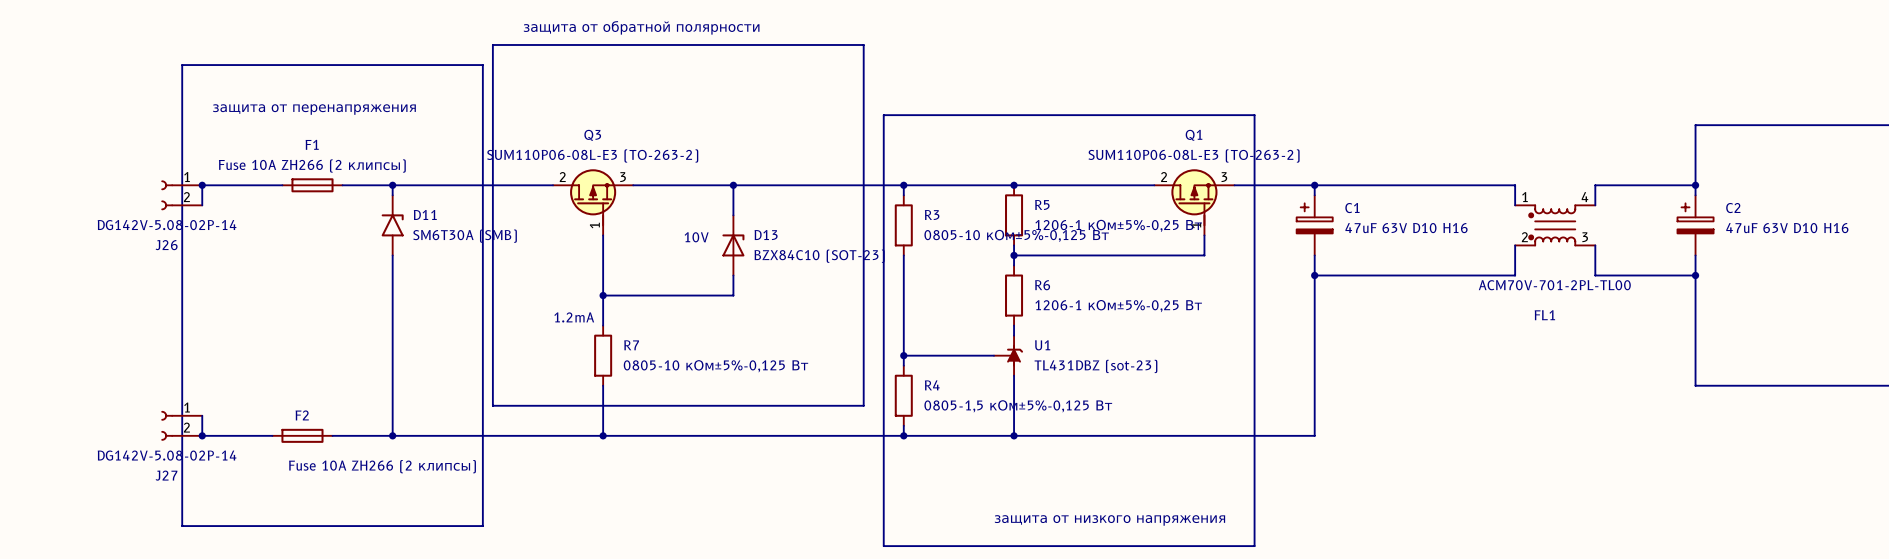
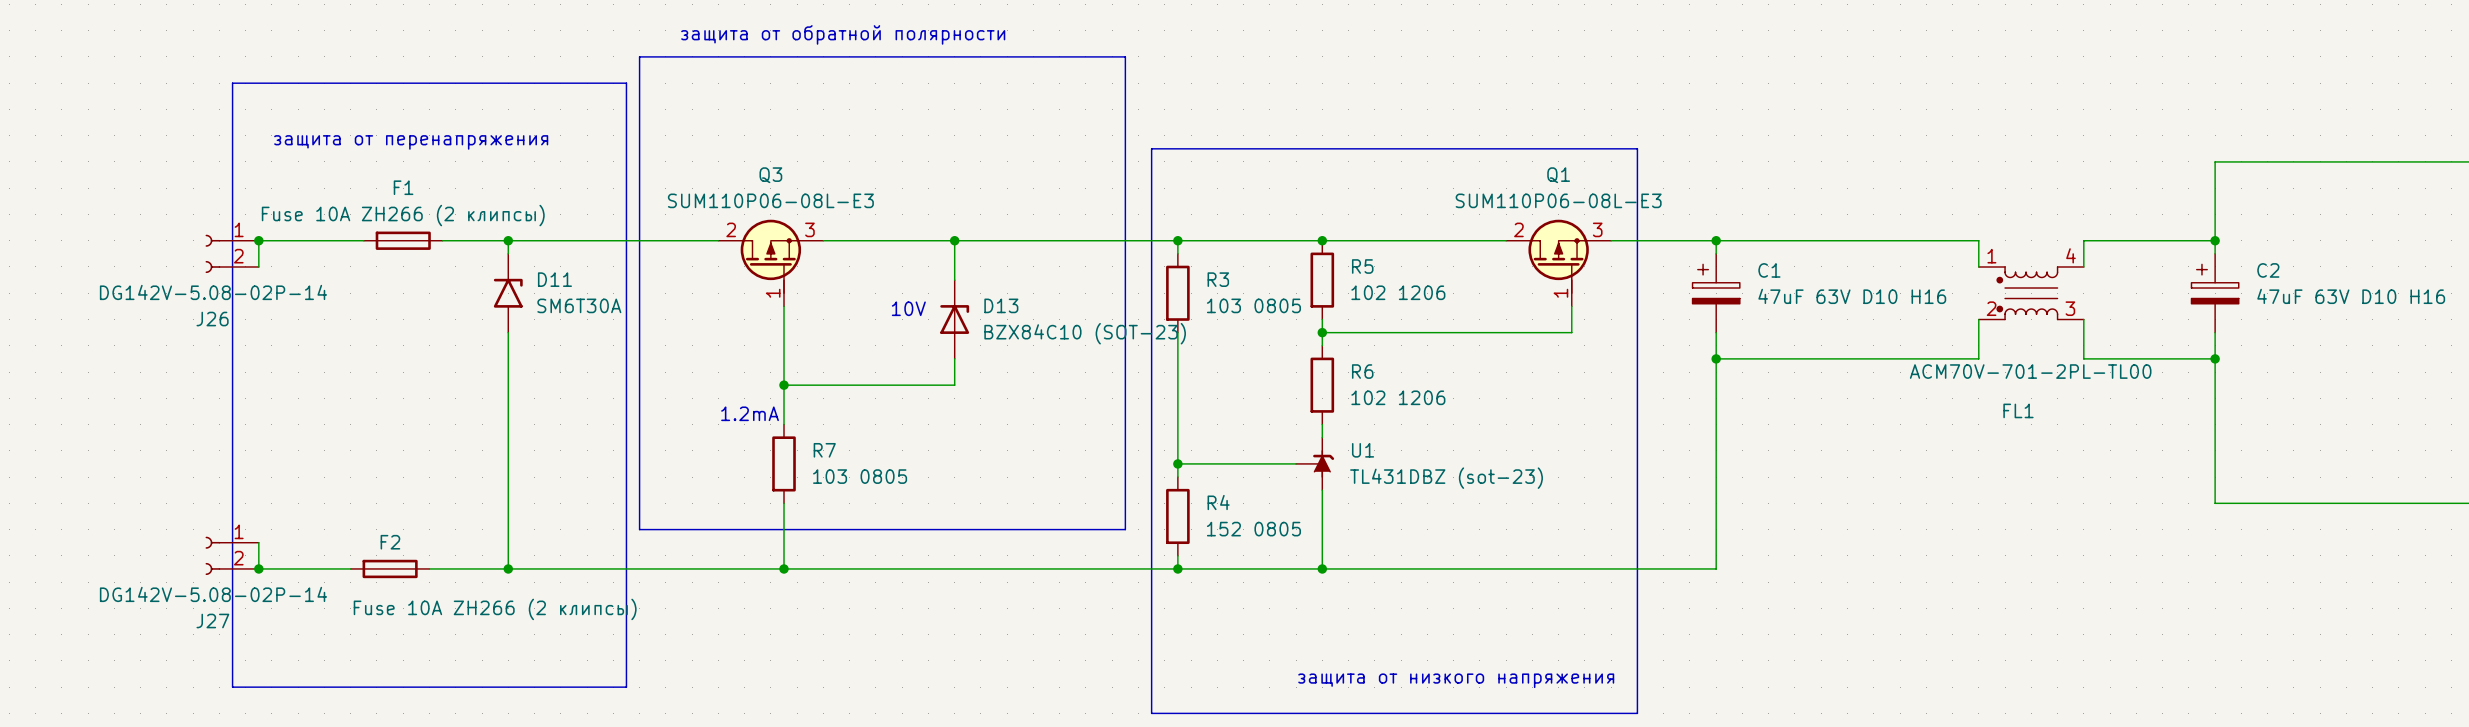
Q3 value: SUM110P06-08L-E3 (TO-263-2) (592, 155) -> SUM110P06-08L-E3 (770, 200)
Q1 value: SUM110P06-08L-E3 (TO-263-2) (1194, 155) -> SUM110P06-08L-E3 (1558, 200)
R5 value: 1206-1 кОм±5%-0,25 Вт (1118, 225) -> 102 1206 (1398, 292)
R3 value: 0805-10 кОм±5%-0,125 Вт (1016, 235) -> 103 0805 (1253, 305)
D11 value: SM6T30A (SMB) (465, 236) -> SM6T30A (579, 305)
R6 value: 1206-1 кОм±5%-0,25 Вт (1118, 306) -> 102 1206 (1398, 397)
R7 value: 0805-10 кОм±5%-0,125 Вт (715, 366) -> 103 0805 (860, 476)
R4 value: 0805-1,5 кОм±5%-0,125 Вт (1018, 406) -> 152 0805 (1253, 529)

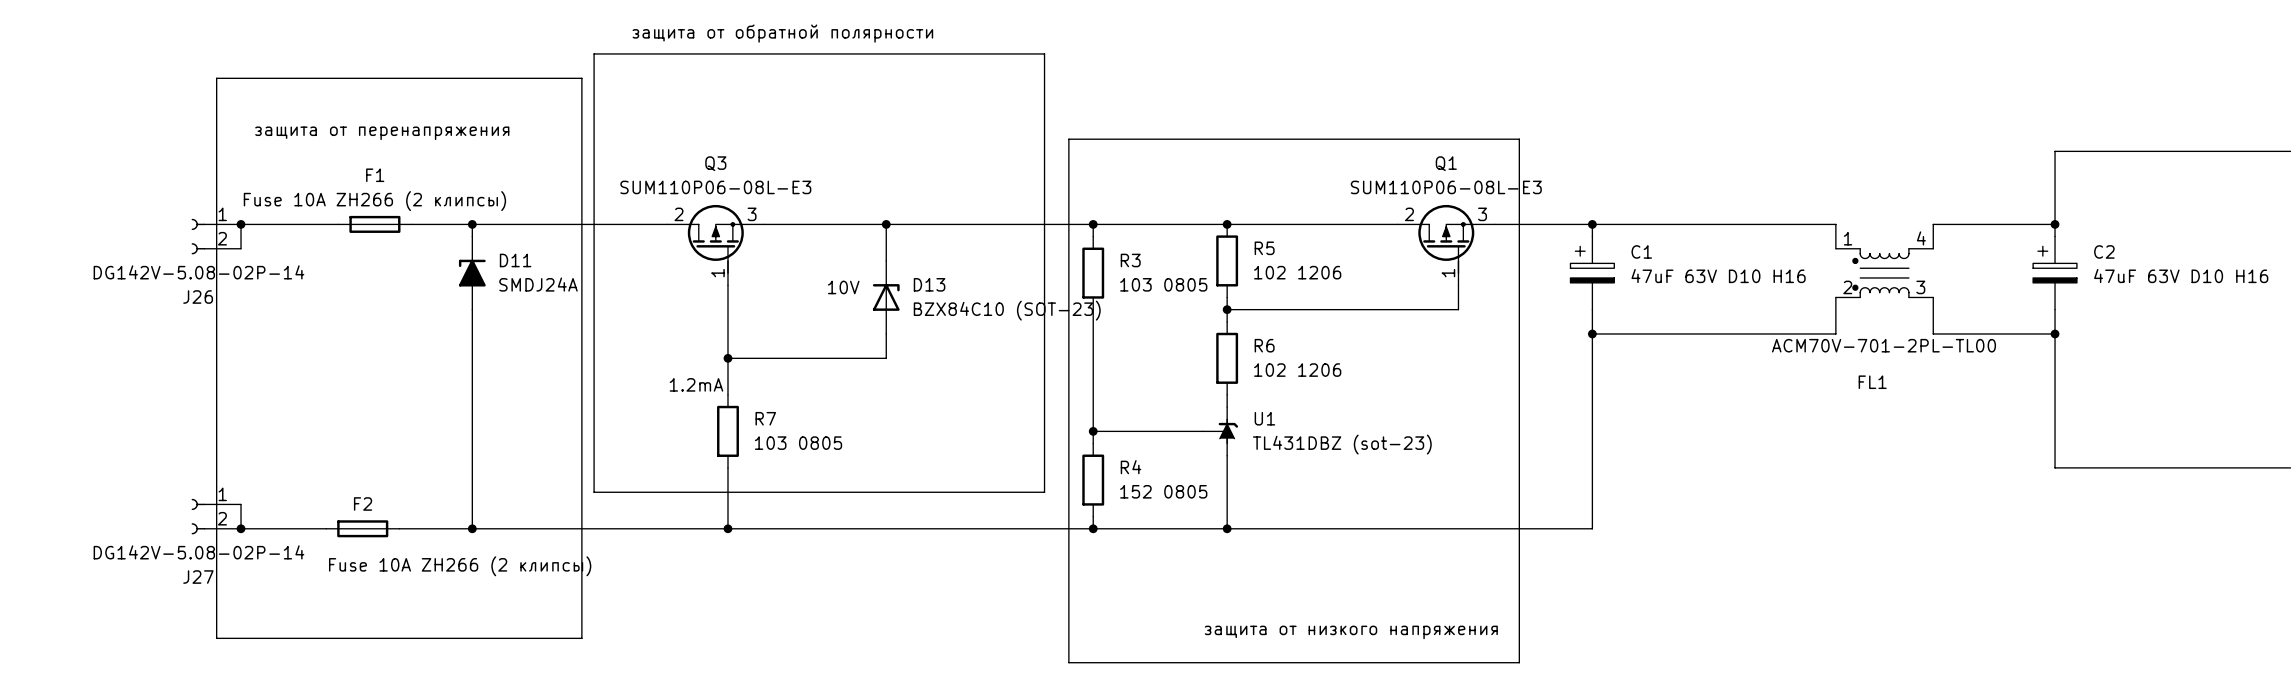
D11 symbol: [493, 253, 523, 333] -> [458, 236, 486, 310]
D11 value: SM6T30A (579, 305) -> SMDJ24A (538, 284)

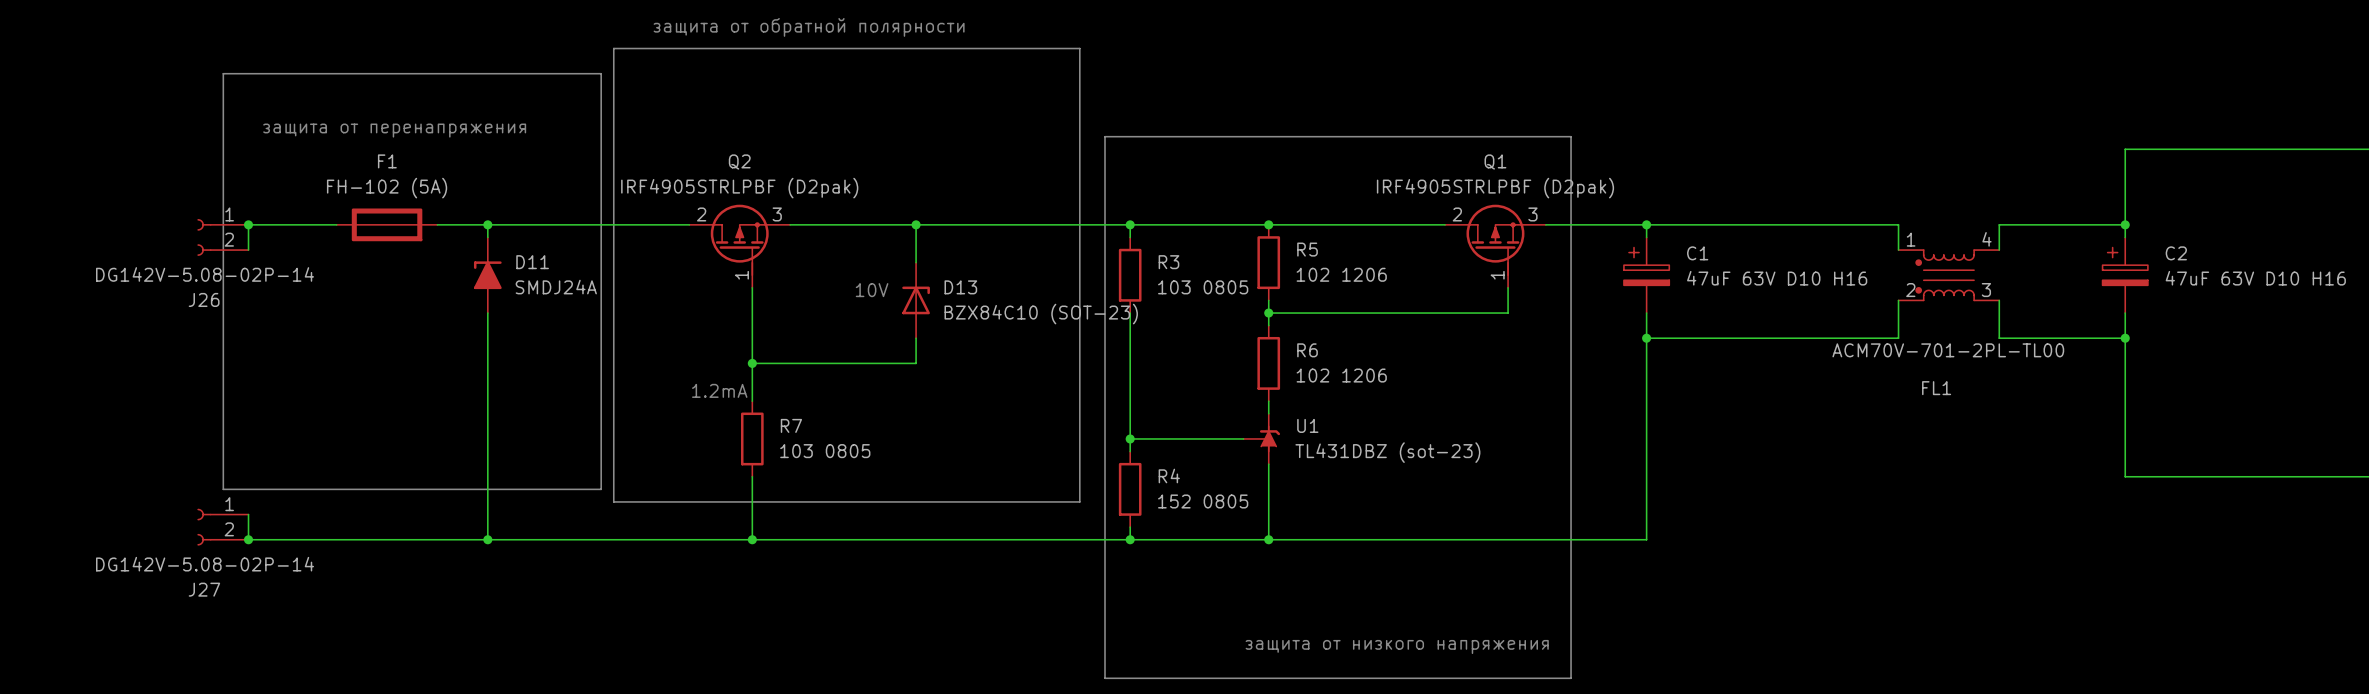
Q3 name: Q3 (715, 163) -> Q2 (739, 162)
Q3 value: SUM110P06-08L-E3 (715, 187) -> IRF4905STRLPBF (D2pak) (739, 188)
Q1 value: SUM110P06-08L-E3 (1446, 187) -> IRF4905STRLPBF (D2pak) (1495, 188)
F1 value: Fuse 10A ZH266 (2 клипсы) (374, 201) -> FH-102 (5A) (387, 188)
F1 symbol: [338, 215, 412, 233] -> [336, 208, 438, 242]
line: (216, 480) (216, 638) (581, 638) (581, 480) -> (223, 489) (601, 489)
F2: Fuse 10A ZH266 (2 клипсы) (362, 528) -> none

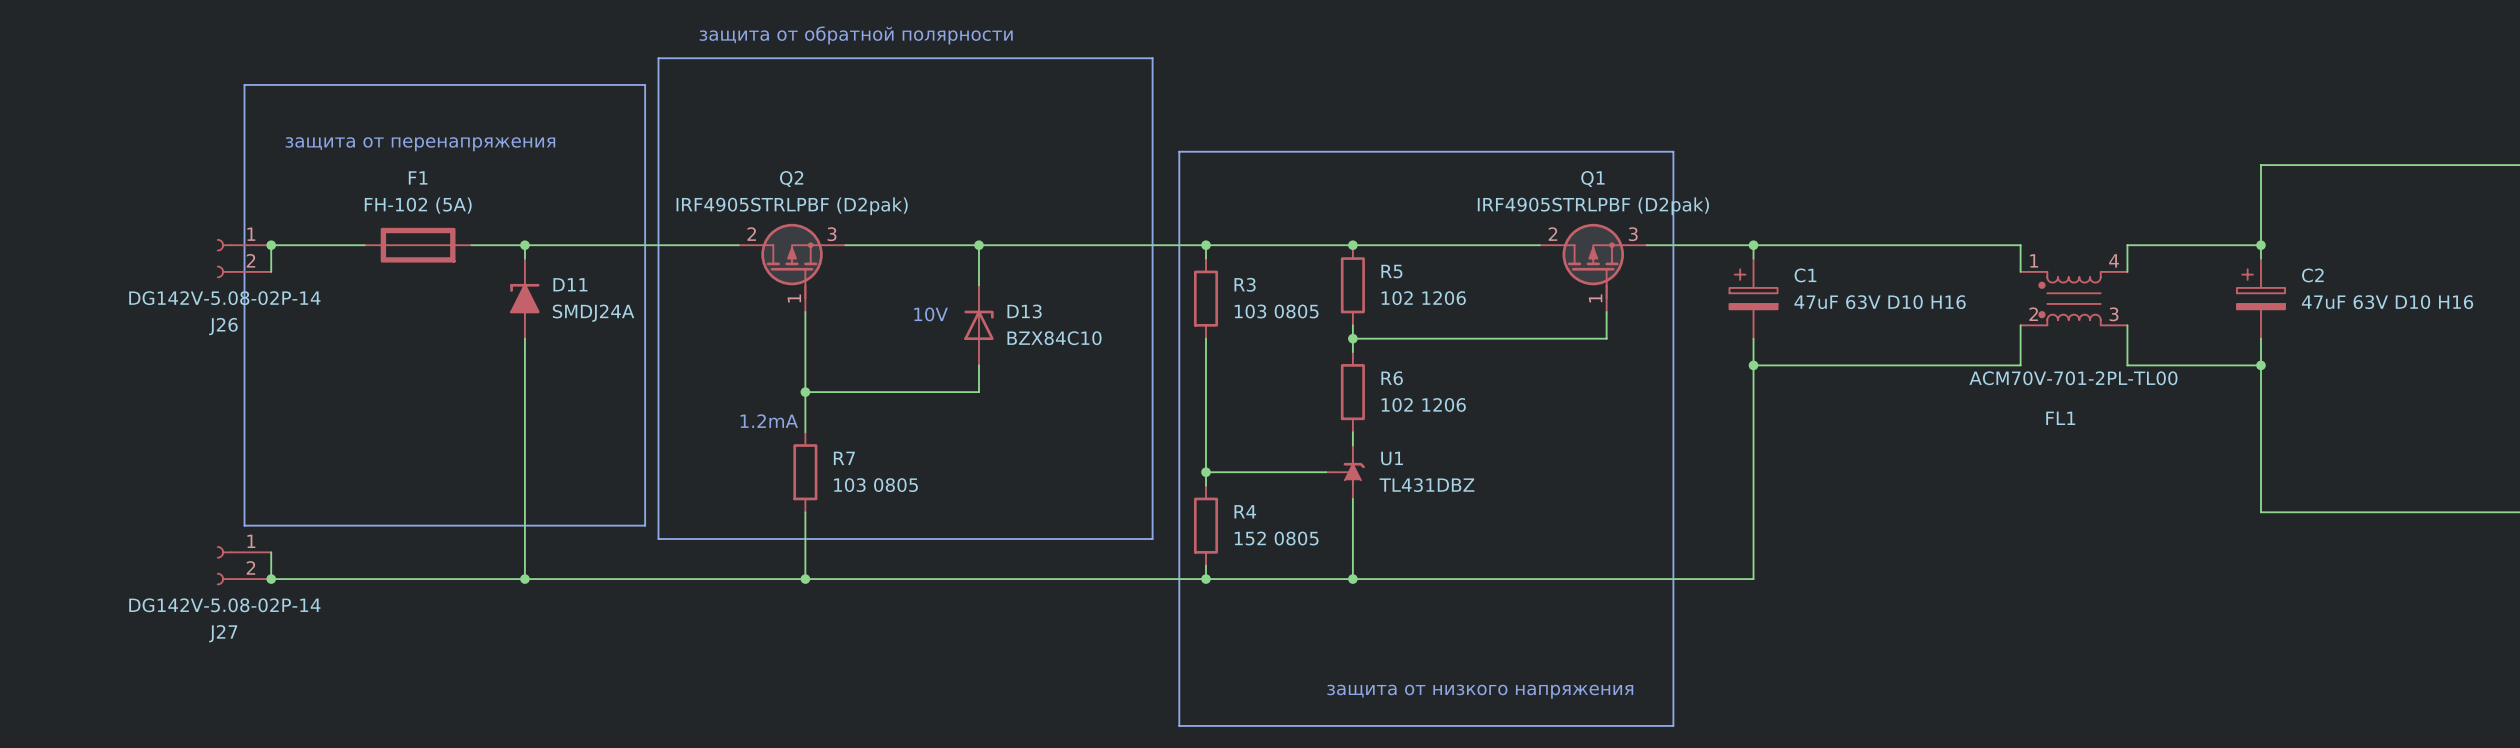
D13 value: BZX84C10 (SOT-23) (1041, 314) -> BZX84C10 (1054, 338)
U1 value: TL431DBZ (sot-23) (1387, 452) -> TL431DBZ (1426, 485)

